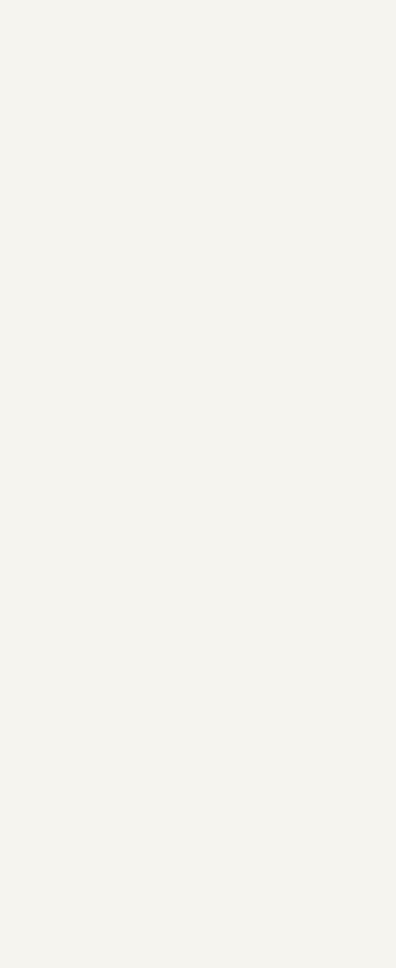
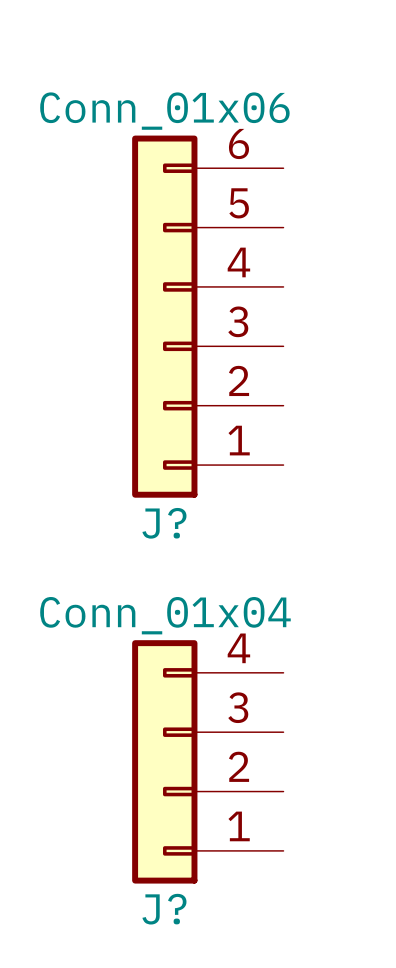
J?: none -> Conn_01x06 (207, 316)
J?: none -> Conn_01x04 (207, 761)

